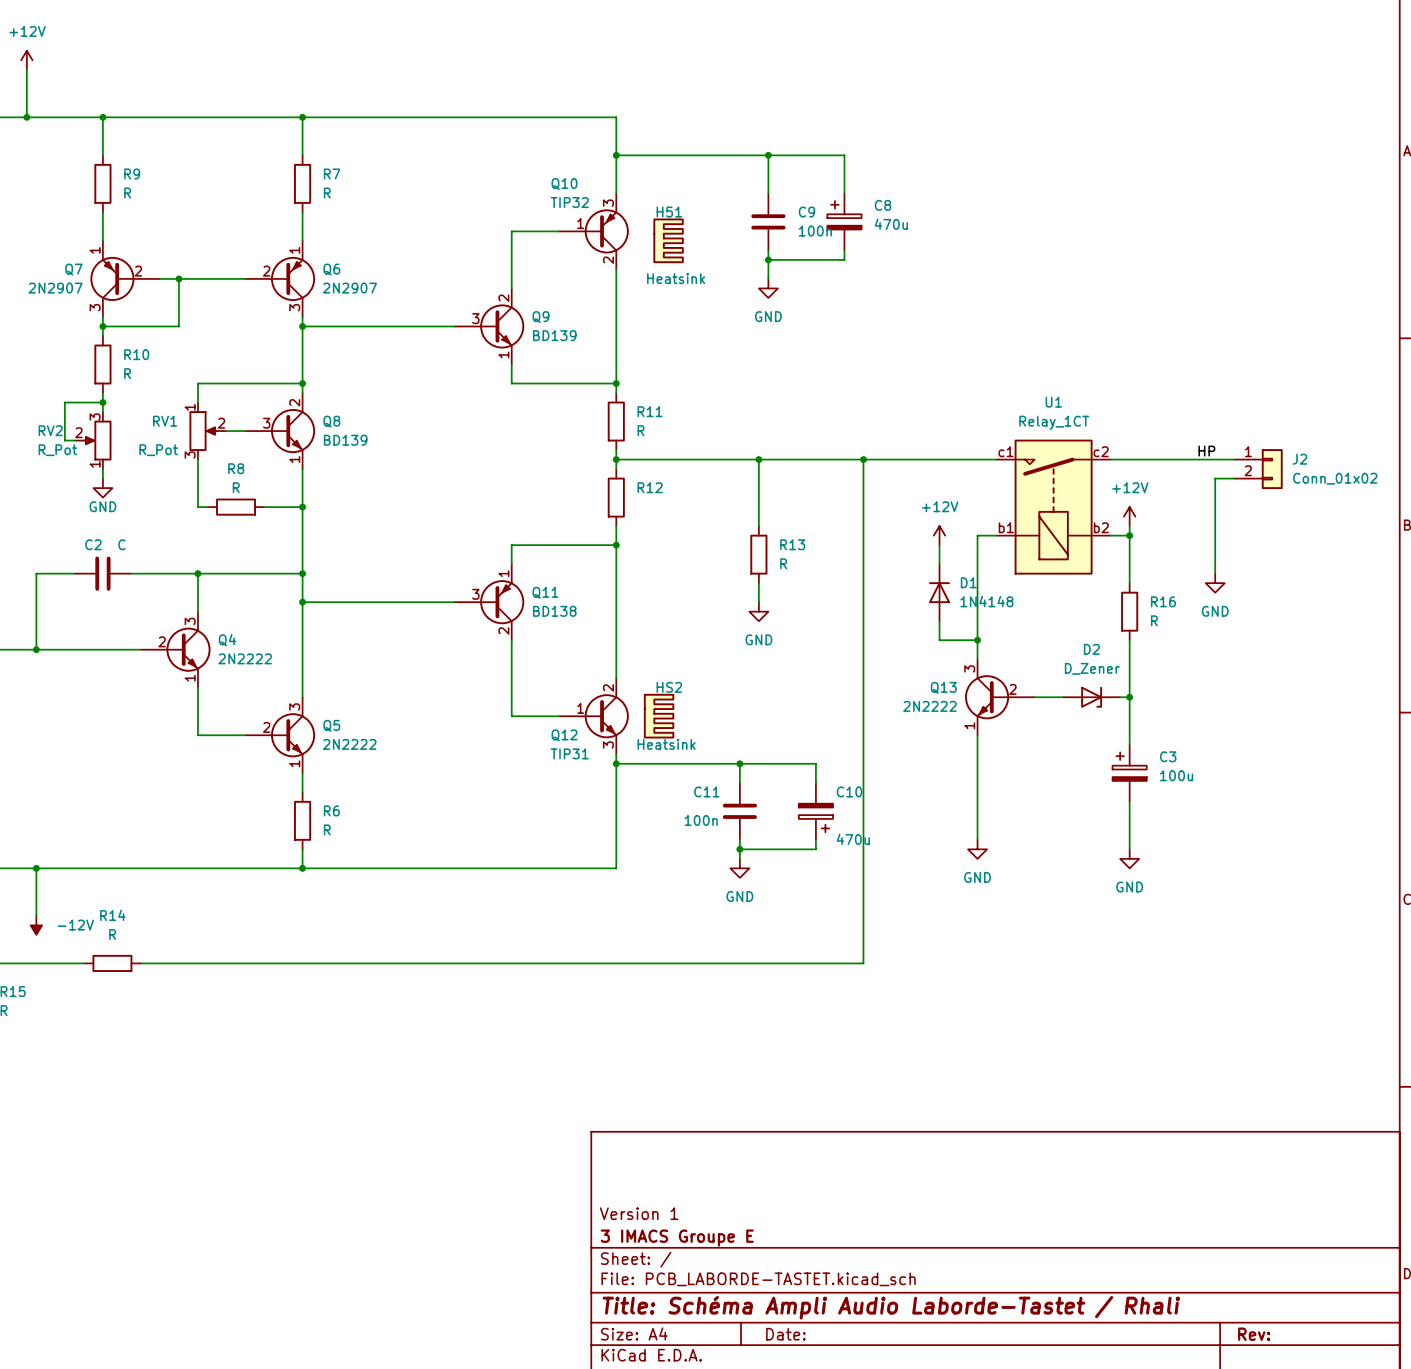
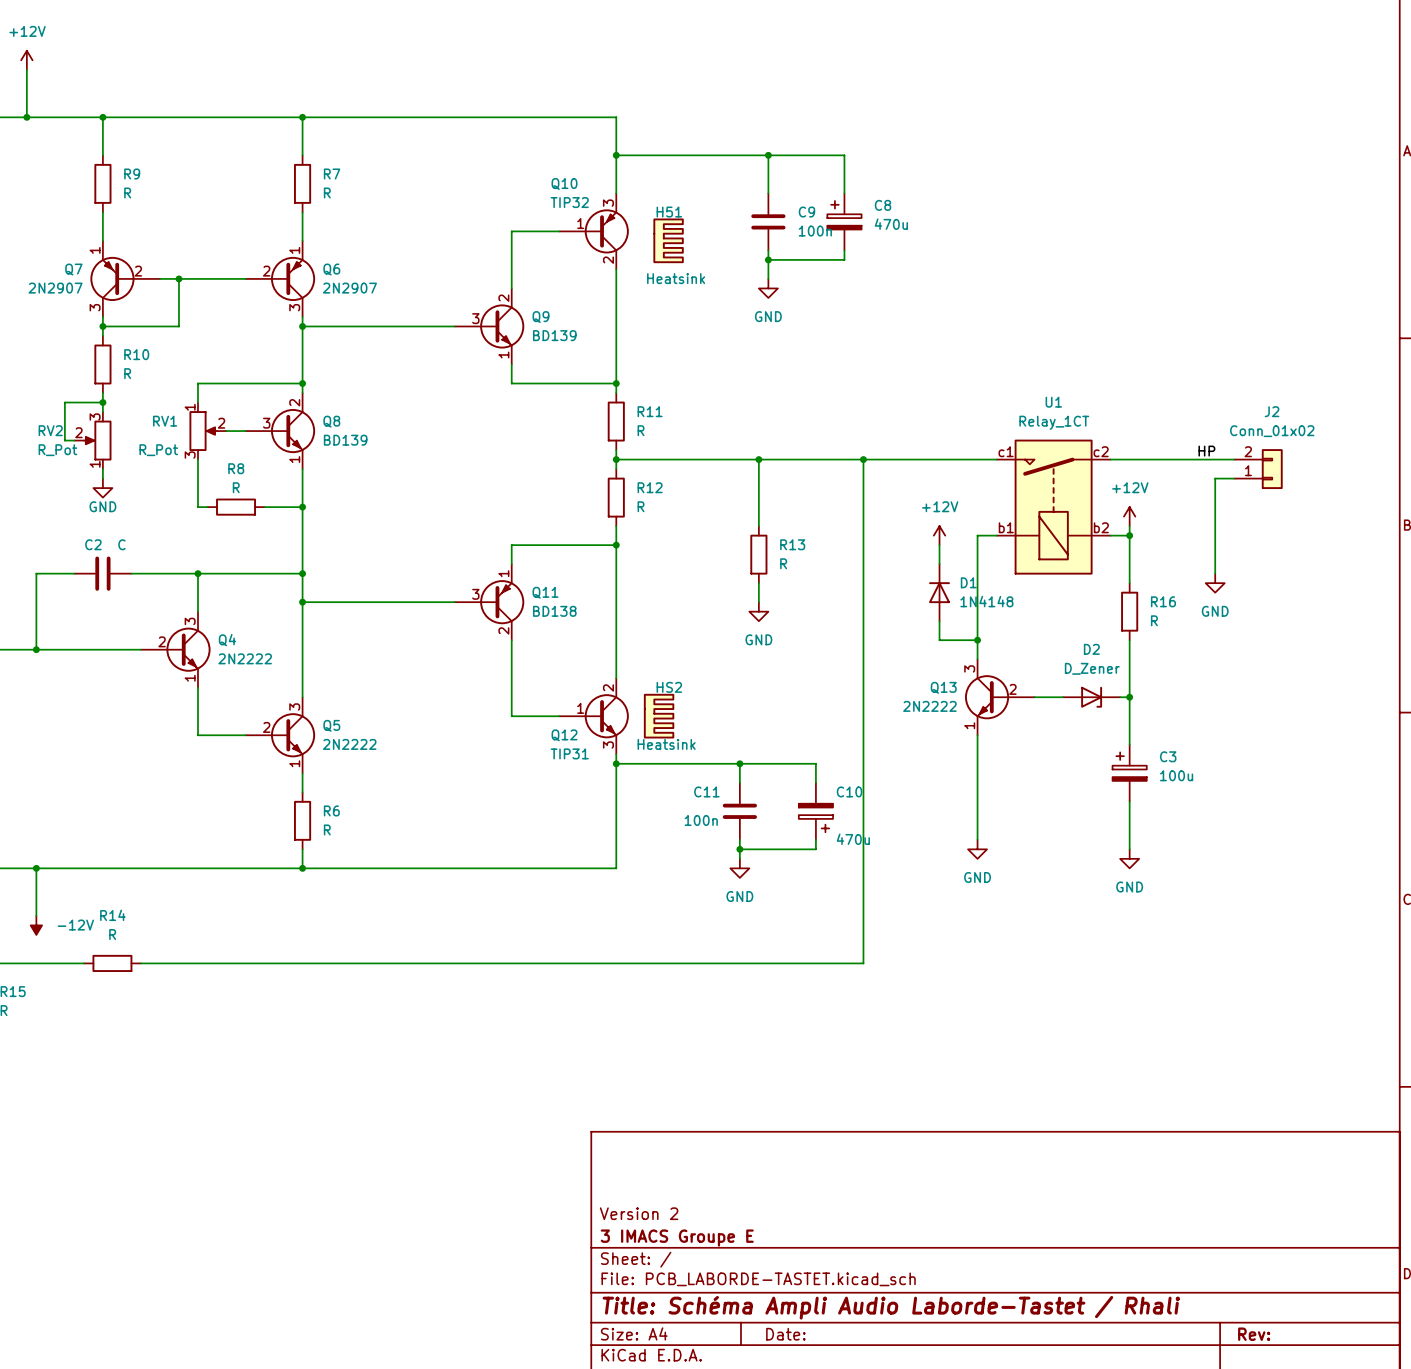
J2 name position: J2 (1299, 459) -> J2 (1272, 411)
J2 flip: as is (1272, 469) -> up-down (1272, 469)
J2 value position: Conn_01x02 (1335, 478) -> Conn_01x02 (1272, 431)
R12 value: none -> R (641, 506)
title block: Version 1 (639, 1213) -> Version 2 (639, 1213)

